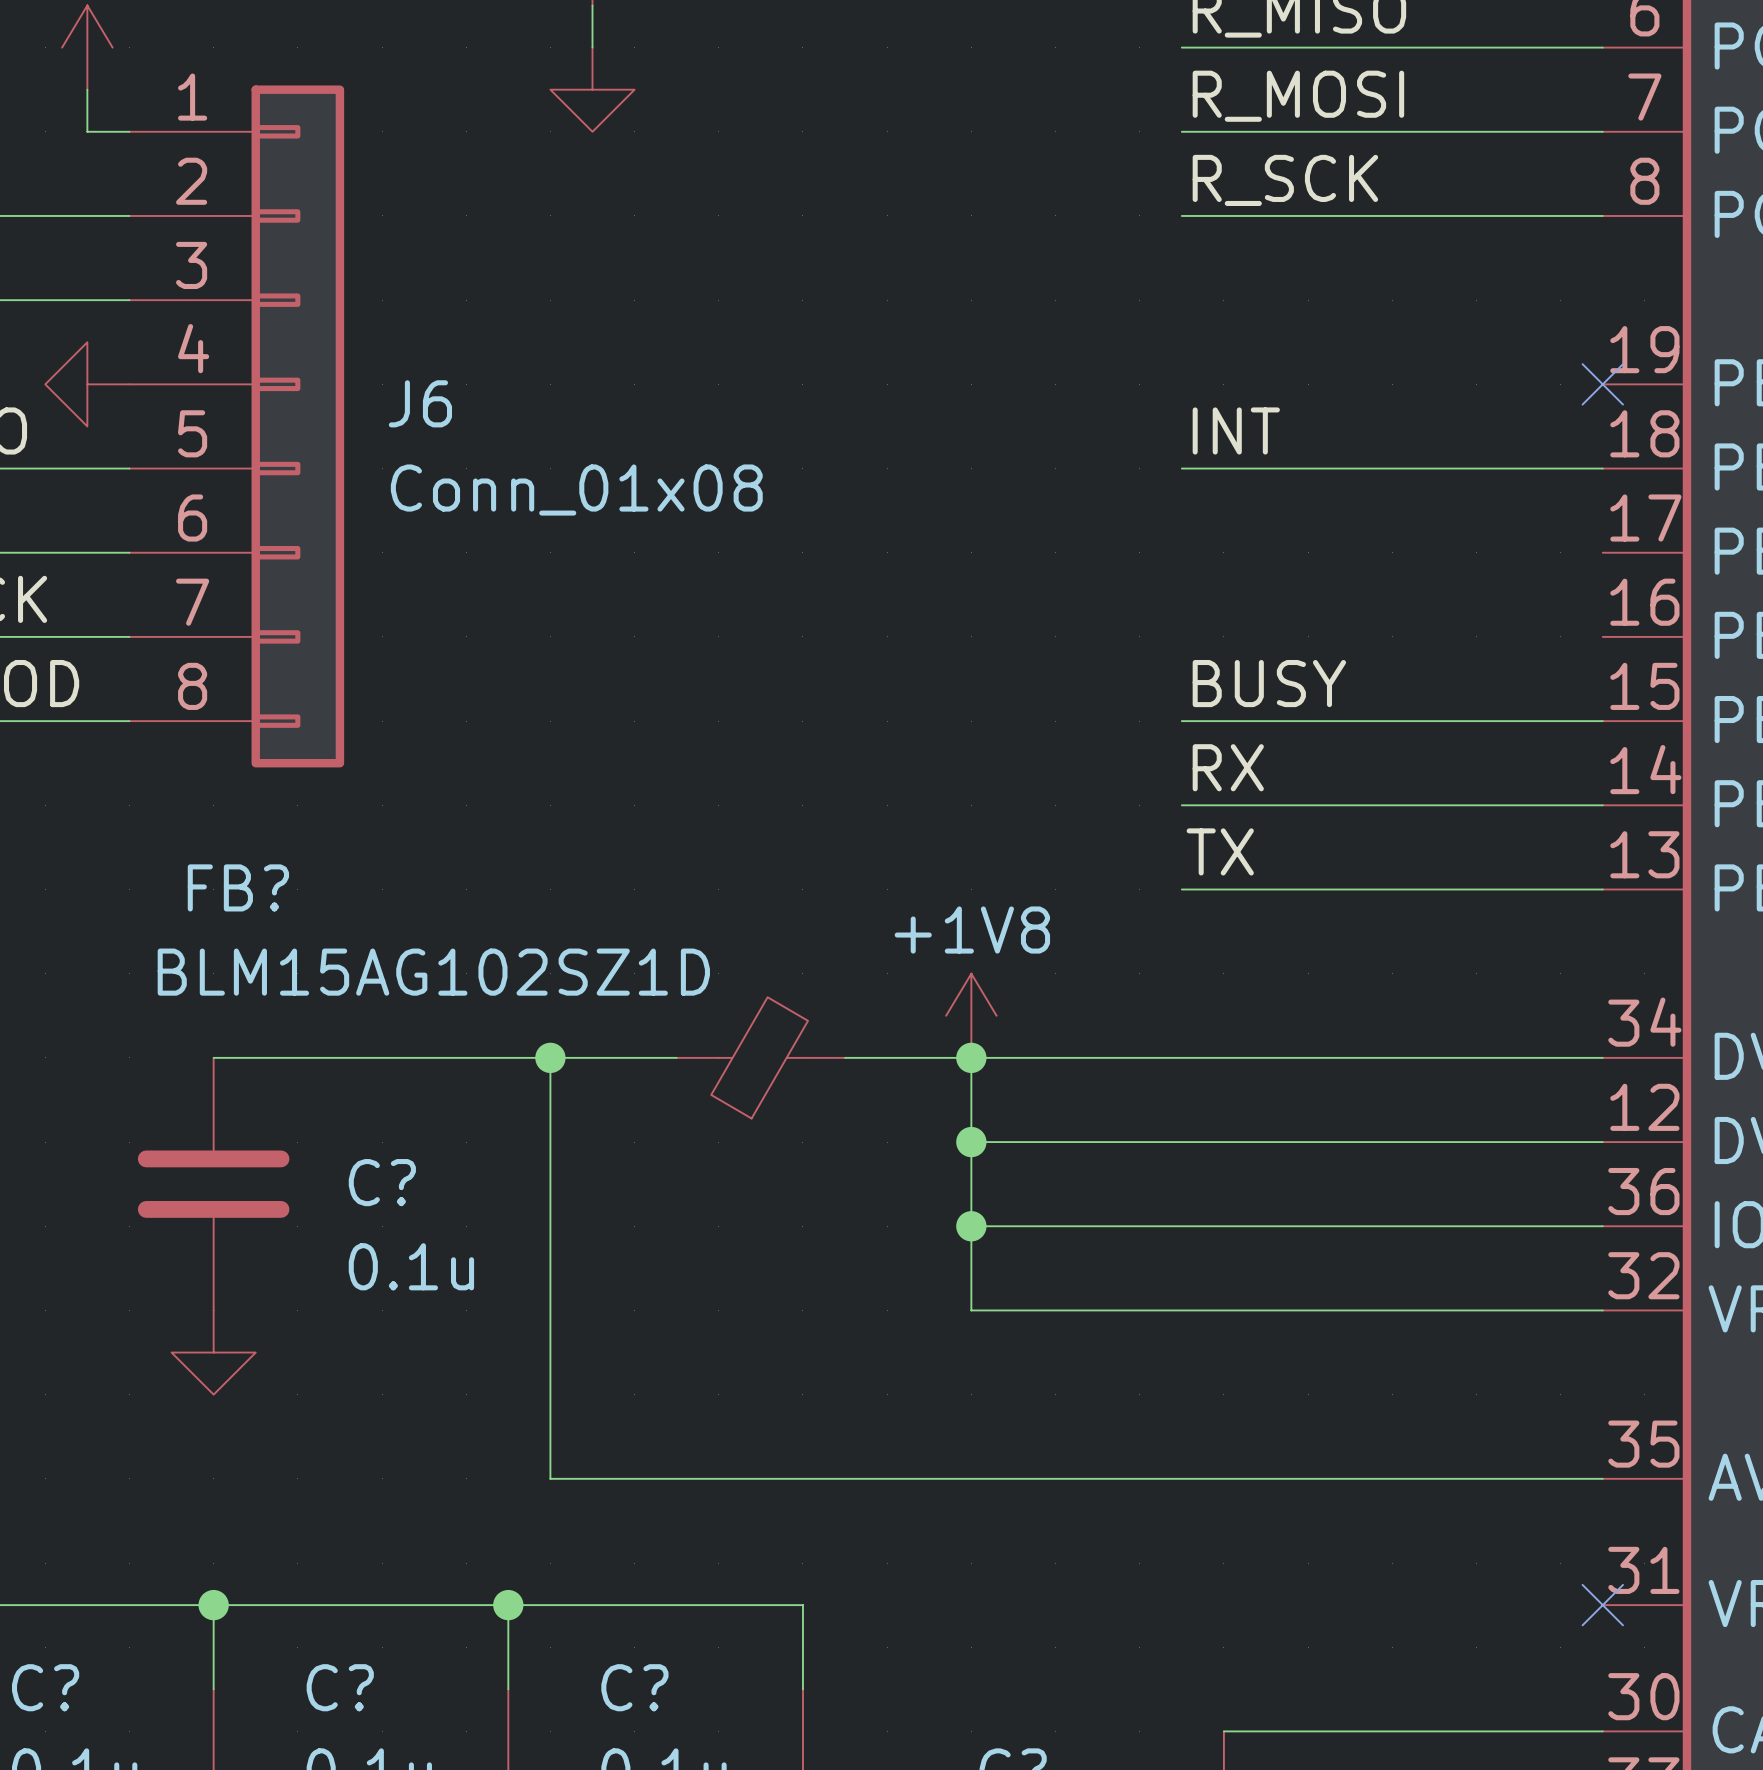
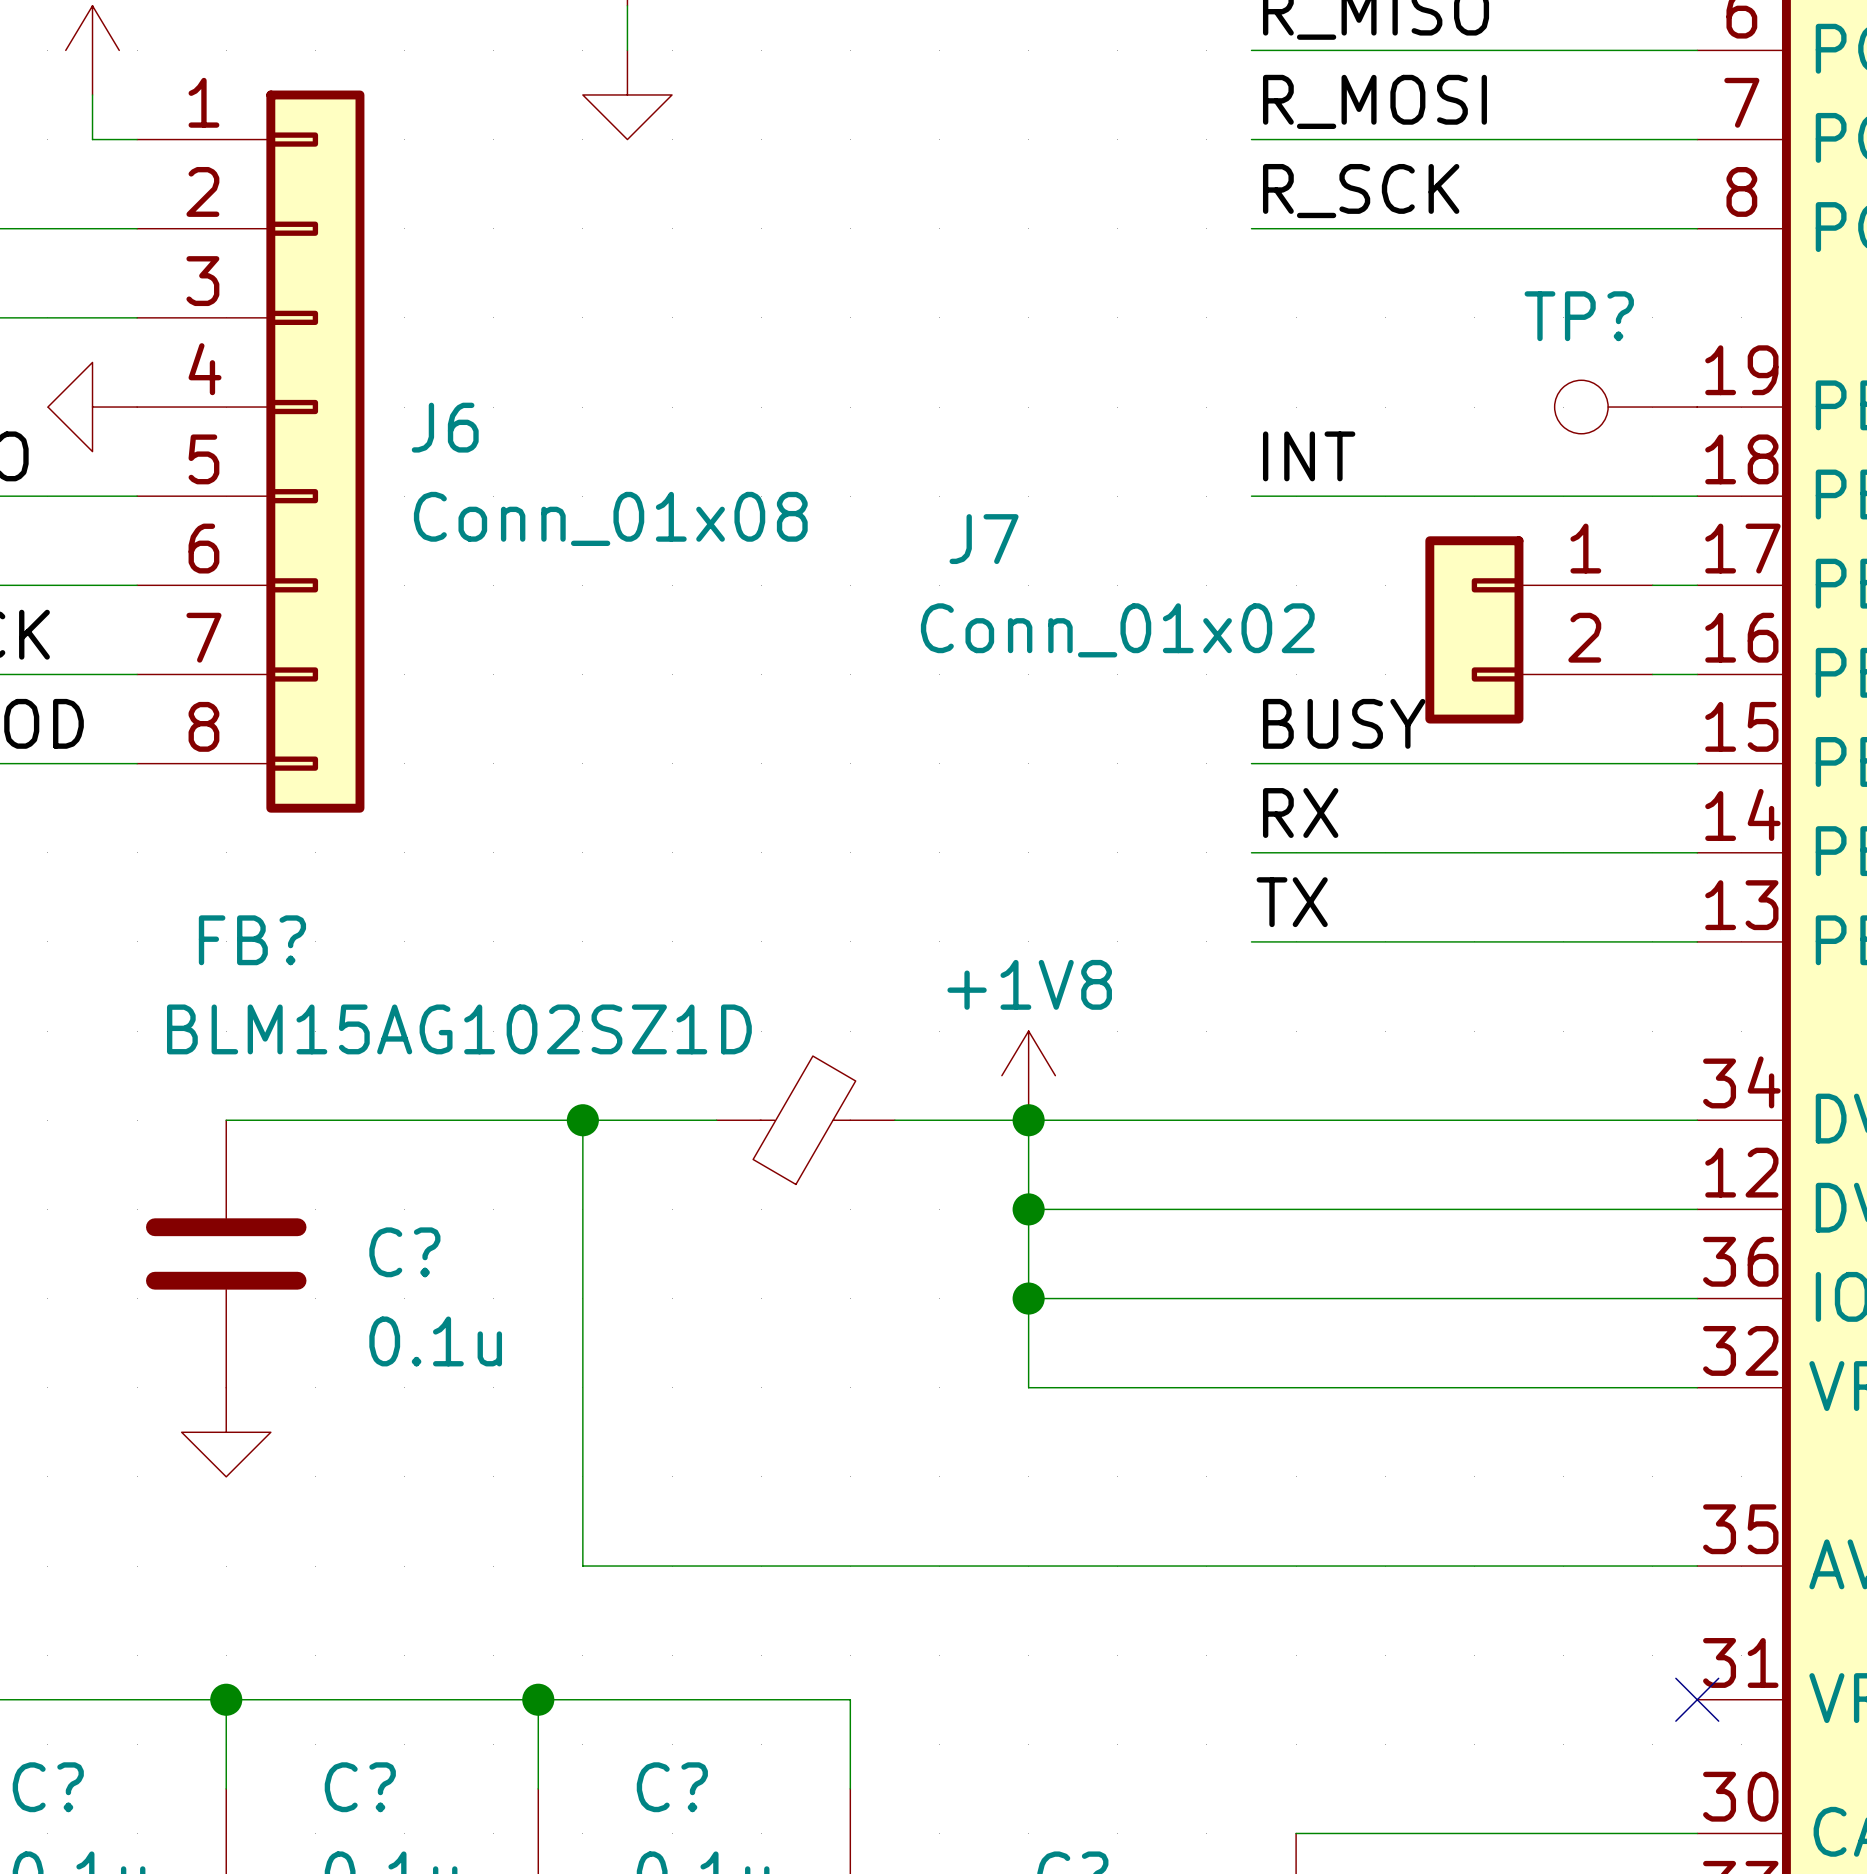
TP?: none -> (1625, 407)
no-connect mark: (1602, 384) -> none
wire: none -> (1652, 585) (1697, 585)
J7: none -> Conn_01x02 (1539, 629)
wire: none -> (1652, 674) (1697, 674)

